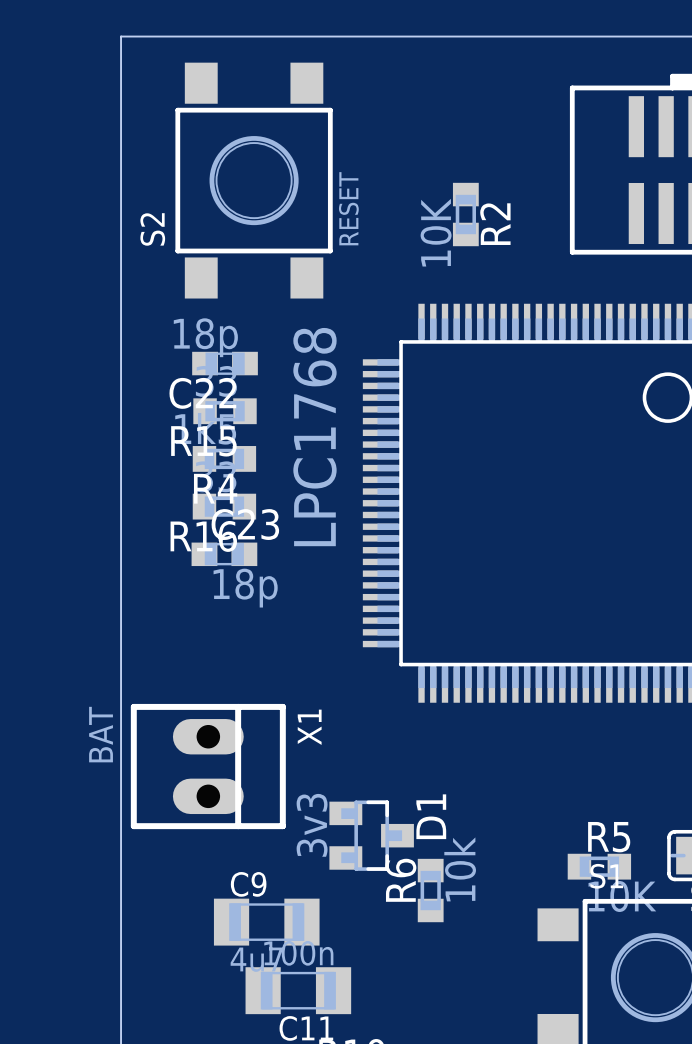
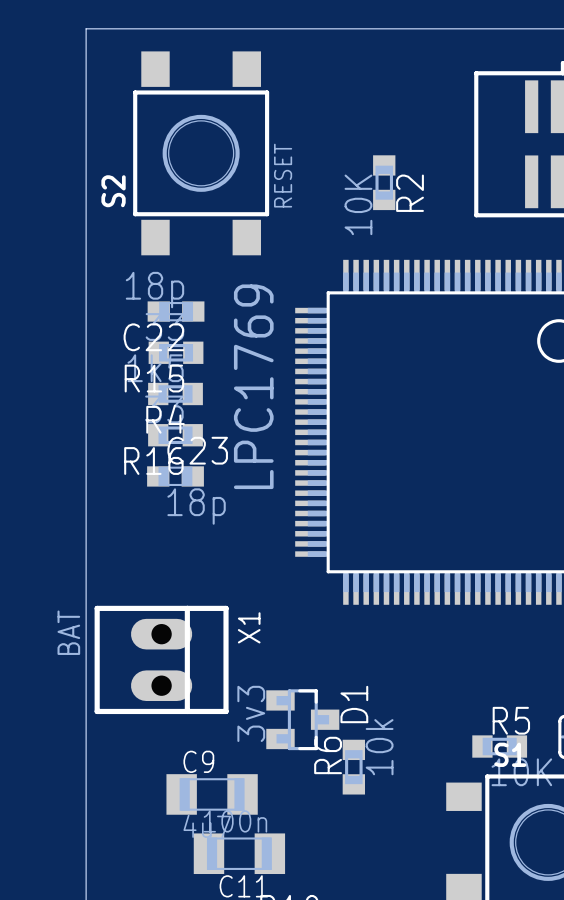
part value: LPC1768 (314, 437) -> LPC1769 (253, 386)

